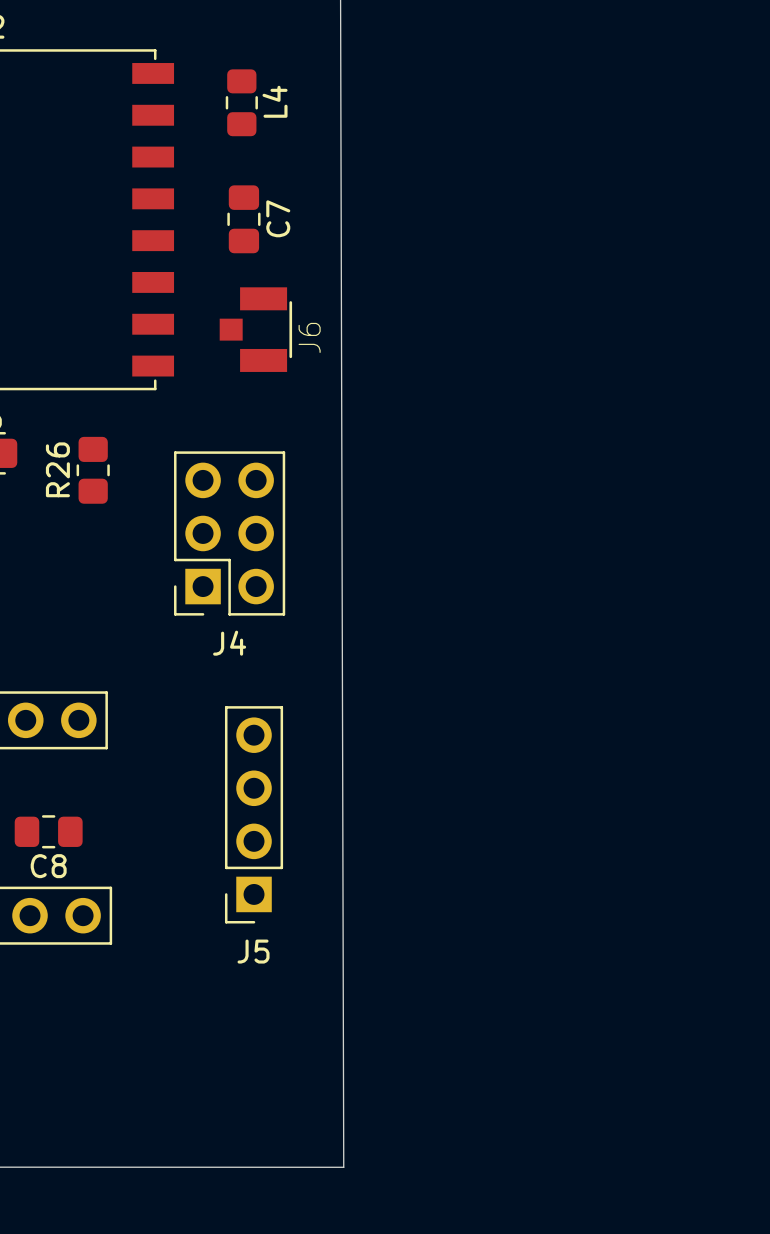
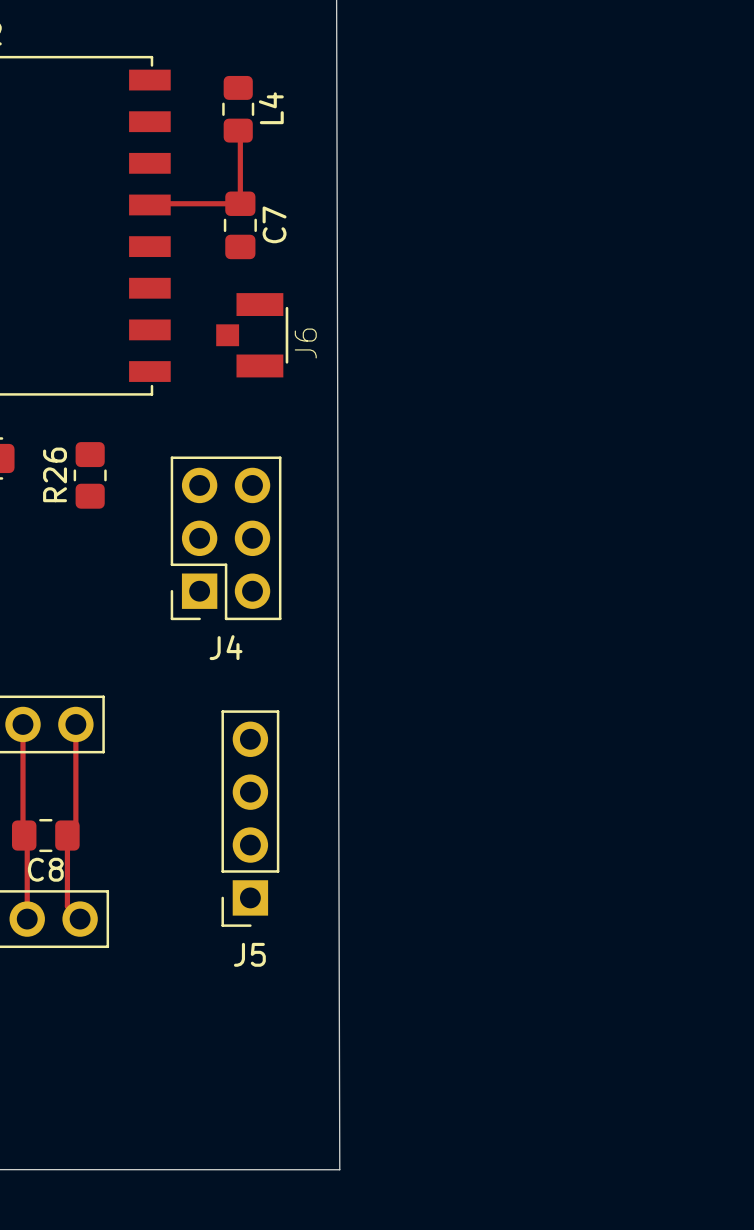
track: none -> (238, 130) (240, 132) (240, 203) (149, 204)
track: none -> (72, 721) (75, 724) (75, 827) (67, 835) (67, 906) (80, 919)
track: none -> (23, 724) (23, 834) (27, 838) (27, 919)

